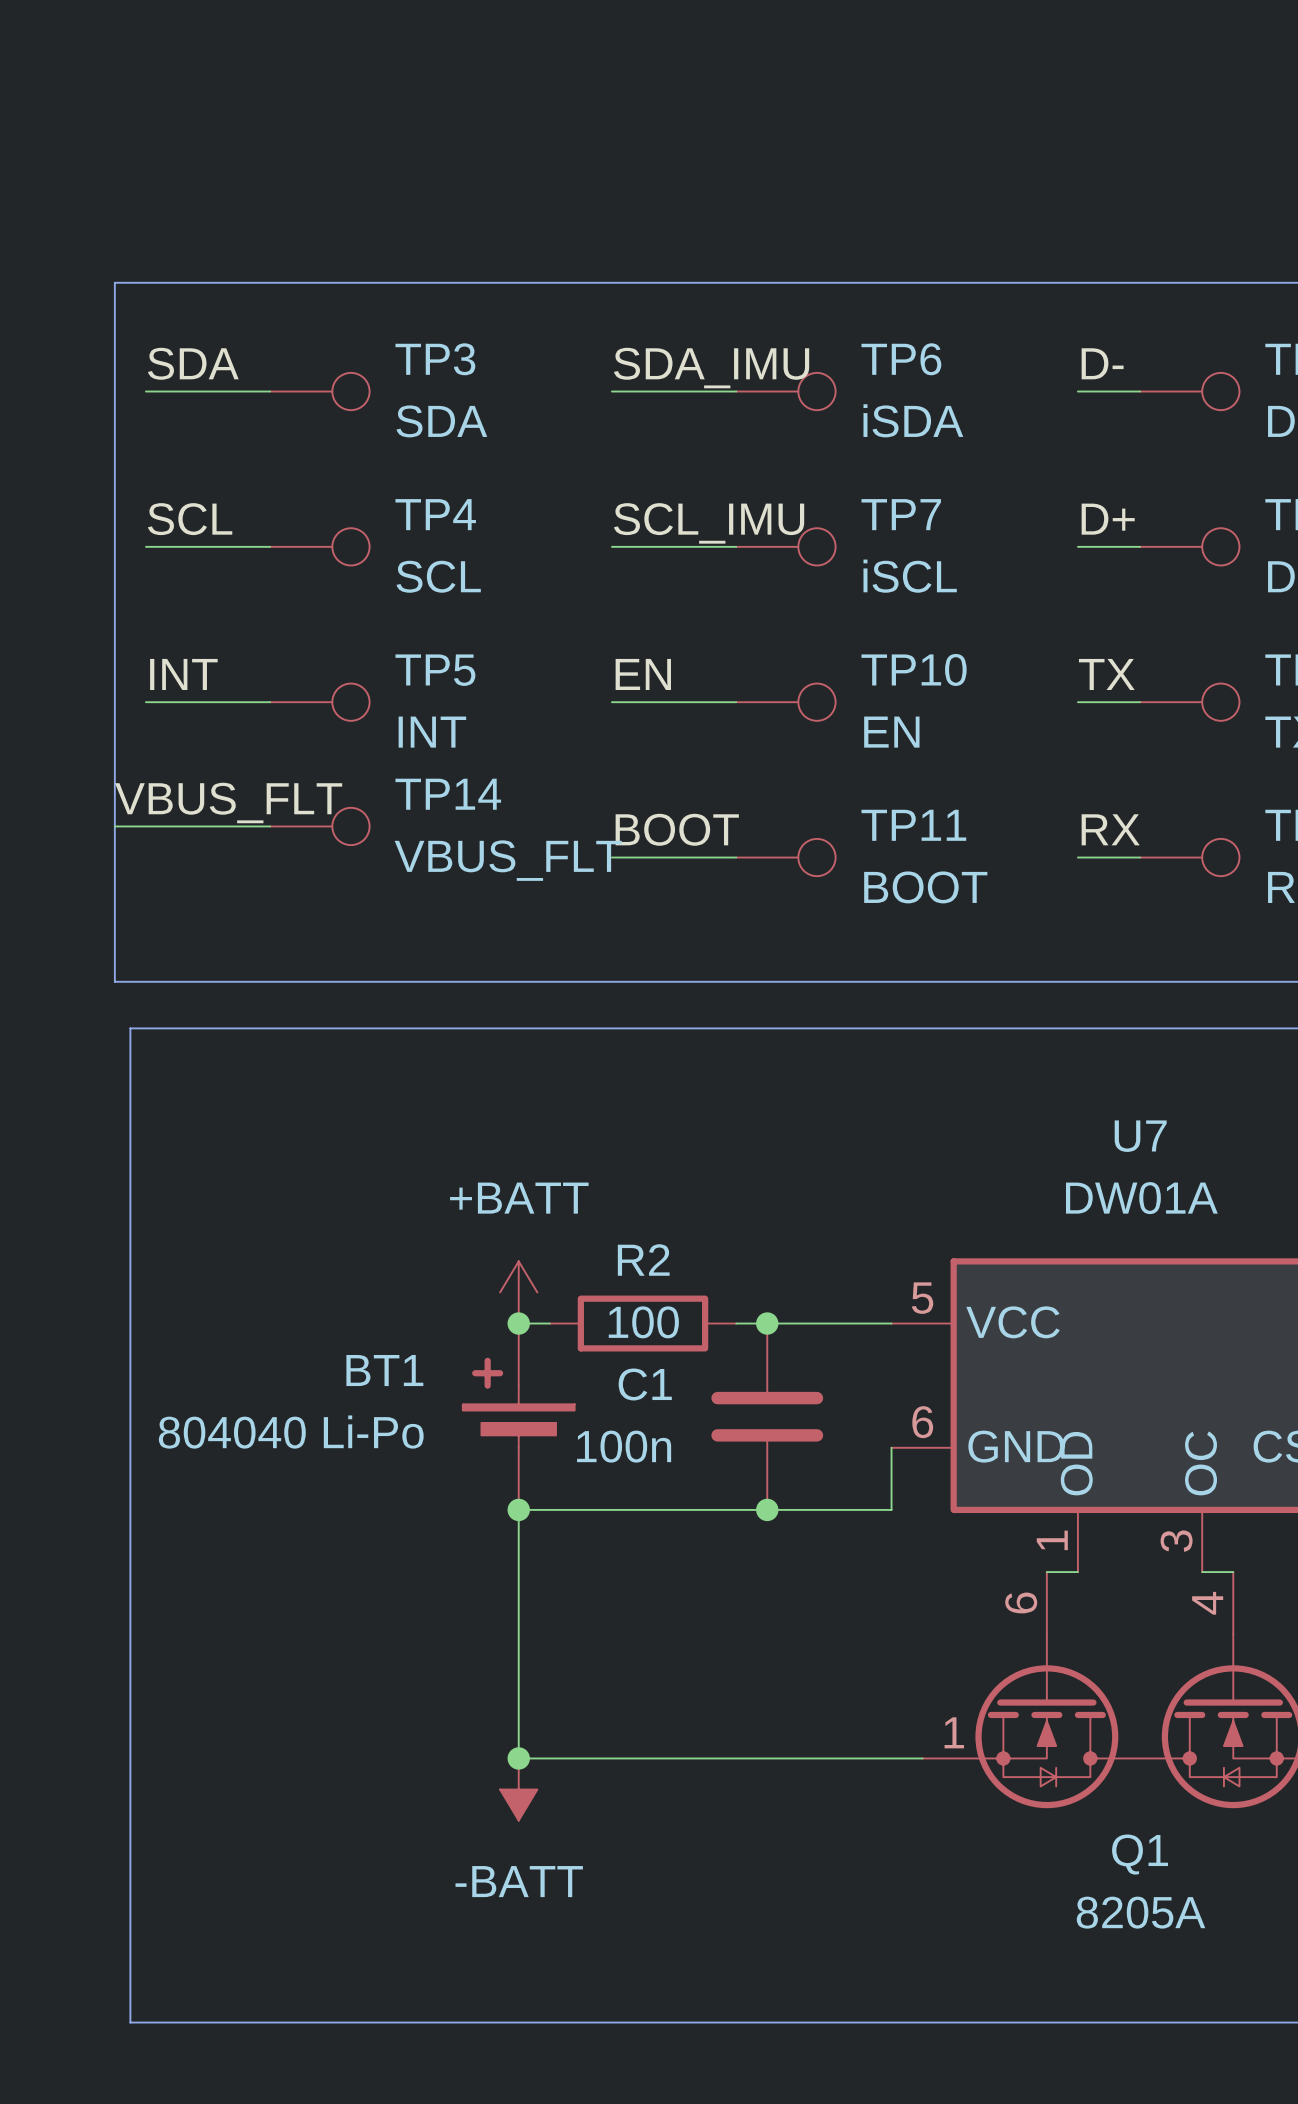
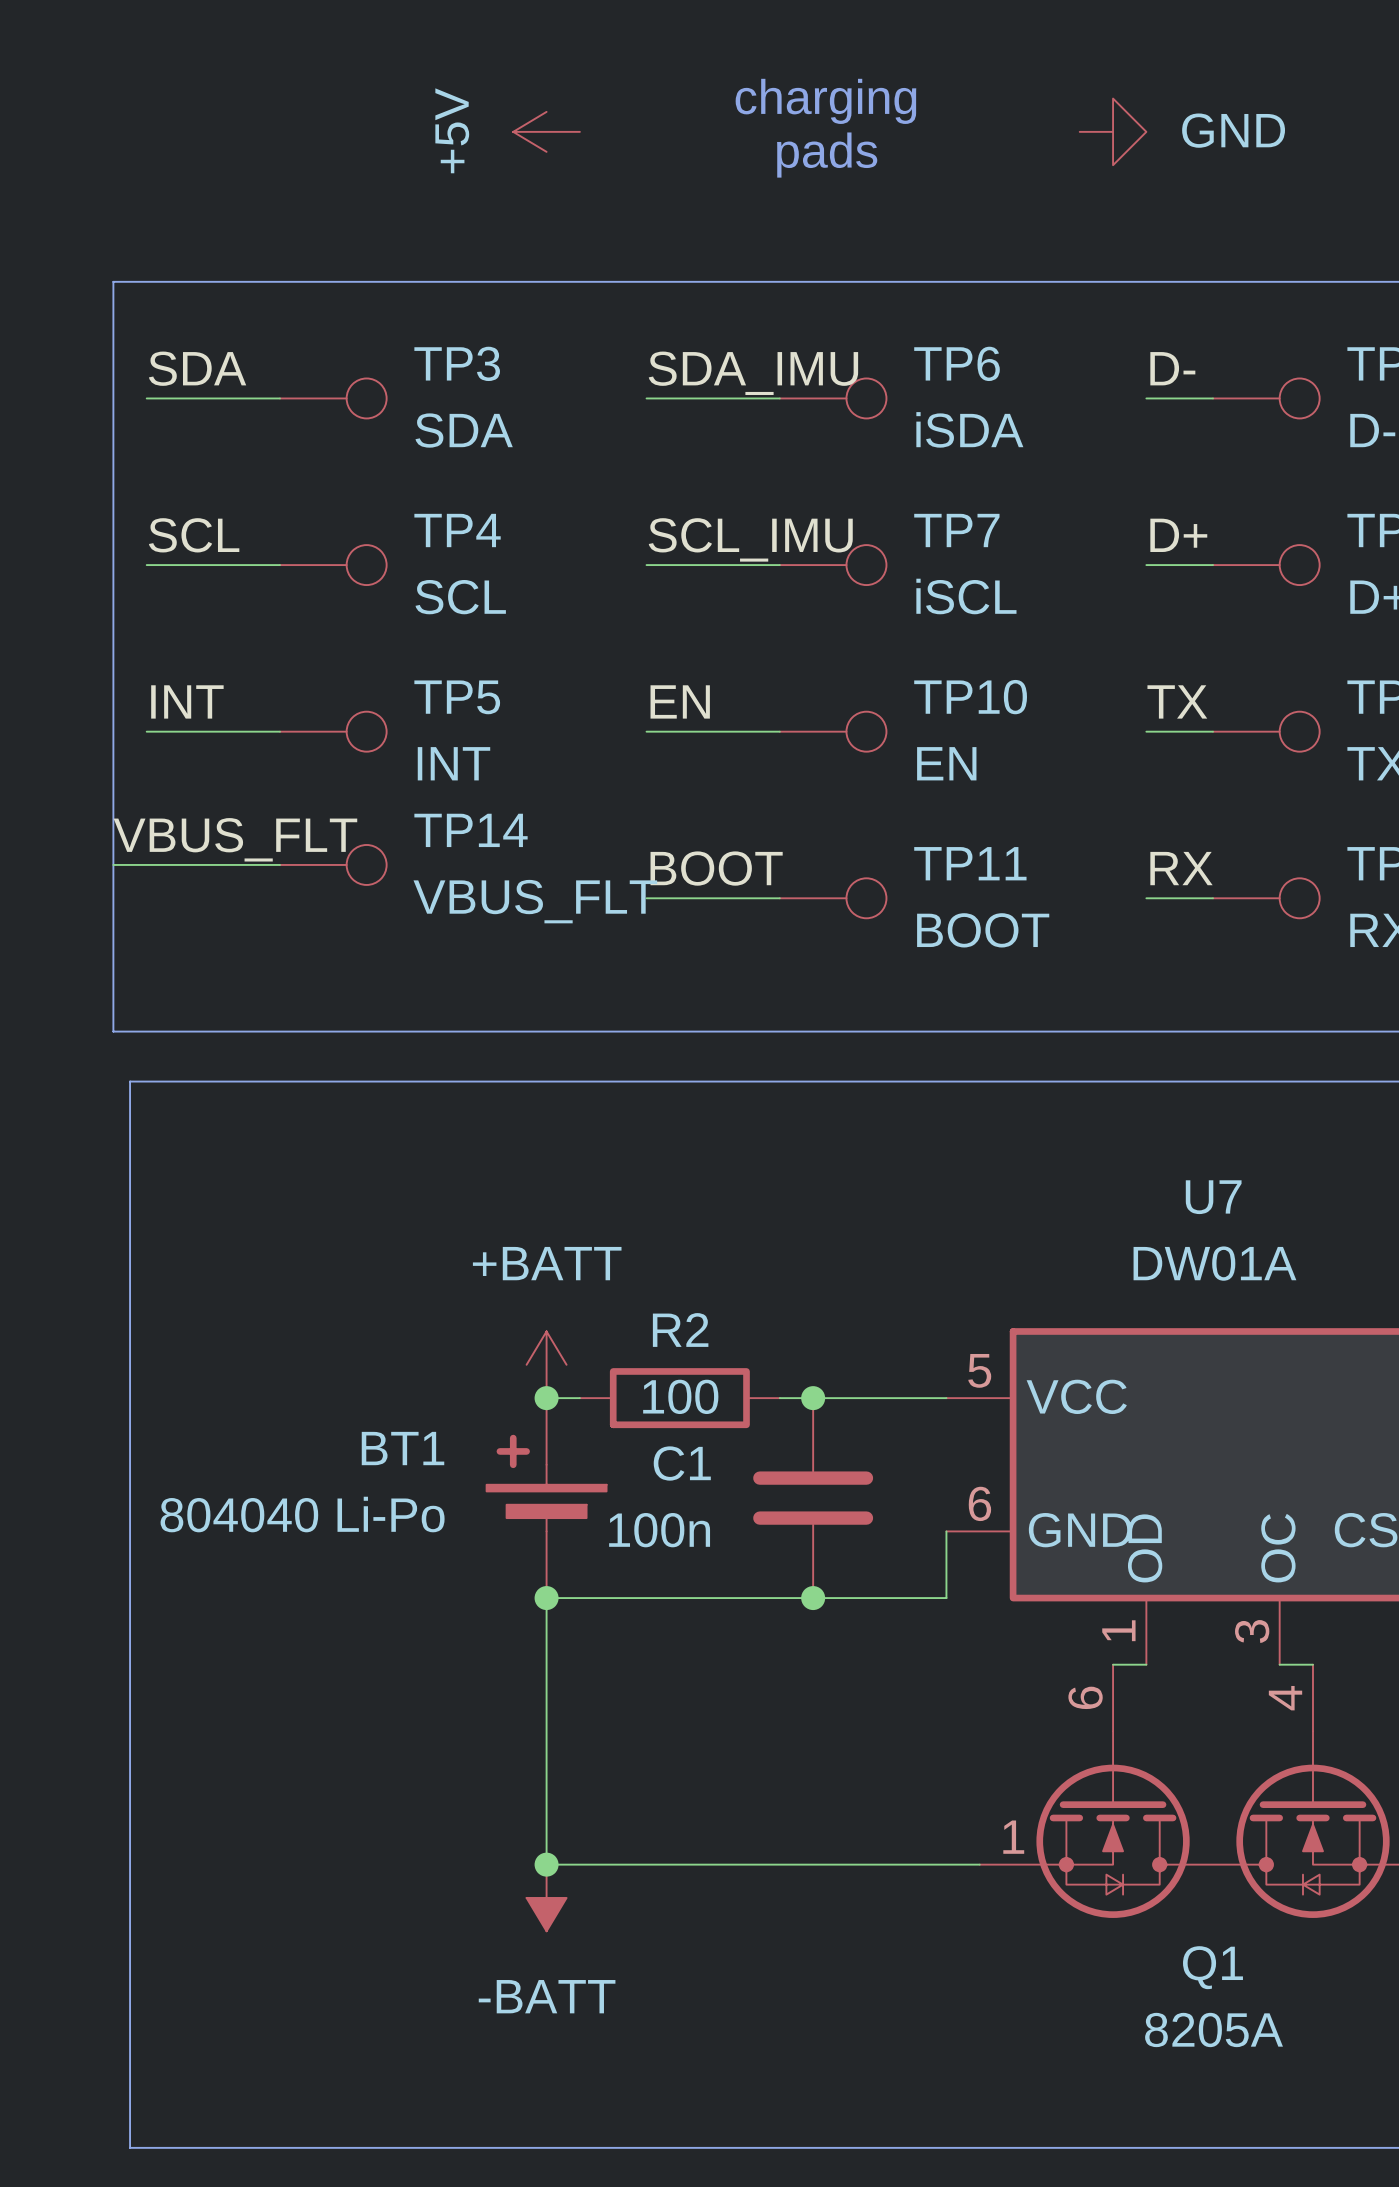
text: none -> charging (825, 101)
power symbol: none -> +5V (546, 131)
power symbol: none -> GND (1113, 131)
text: none -> pads (827, 155)

